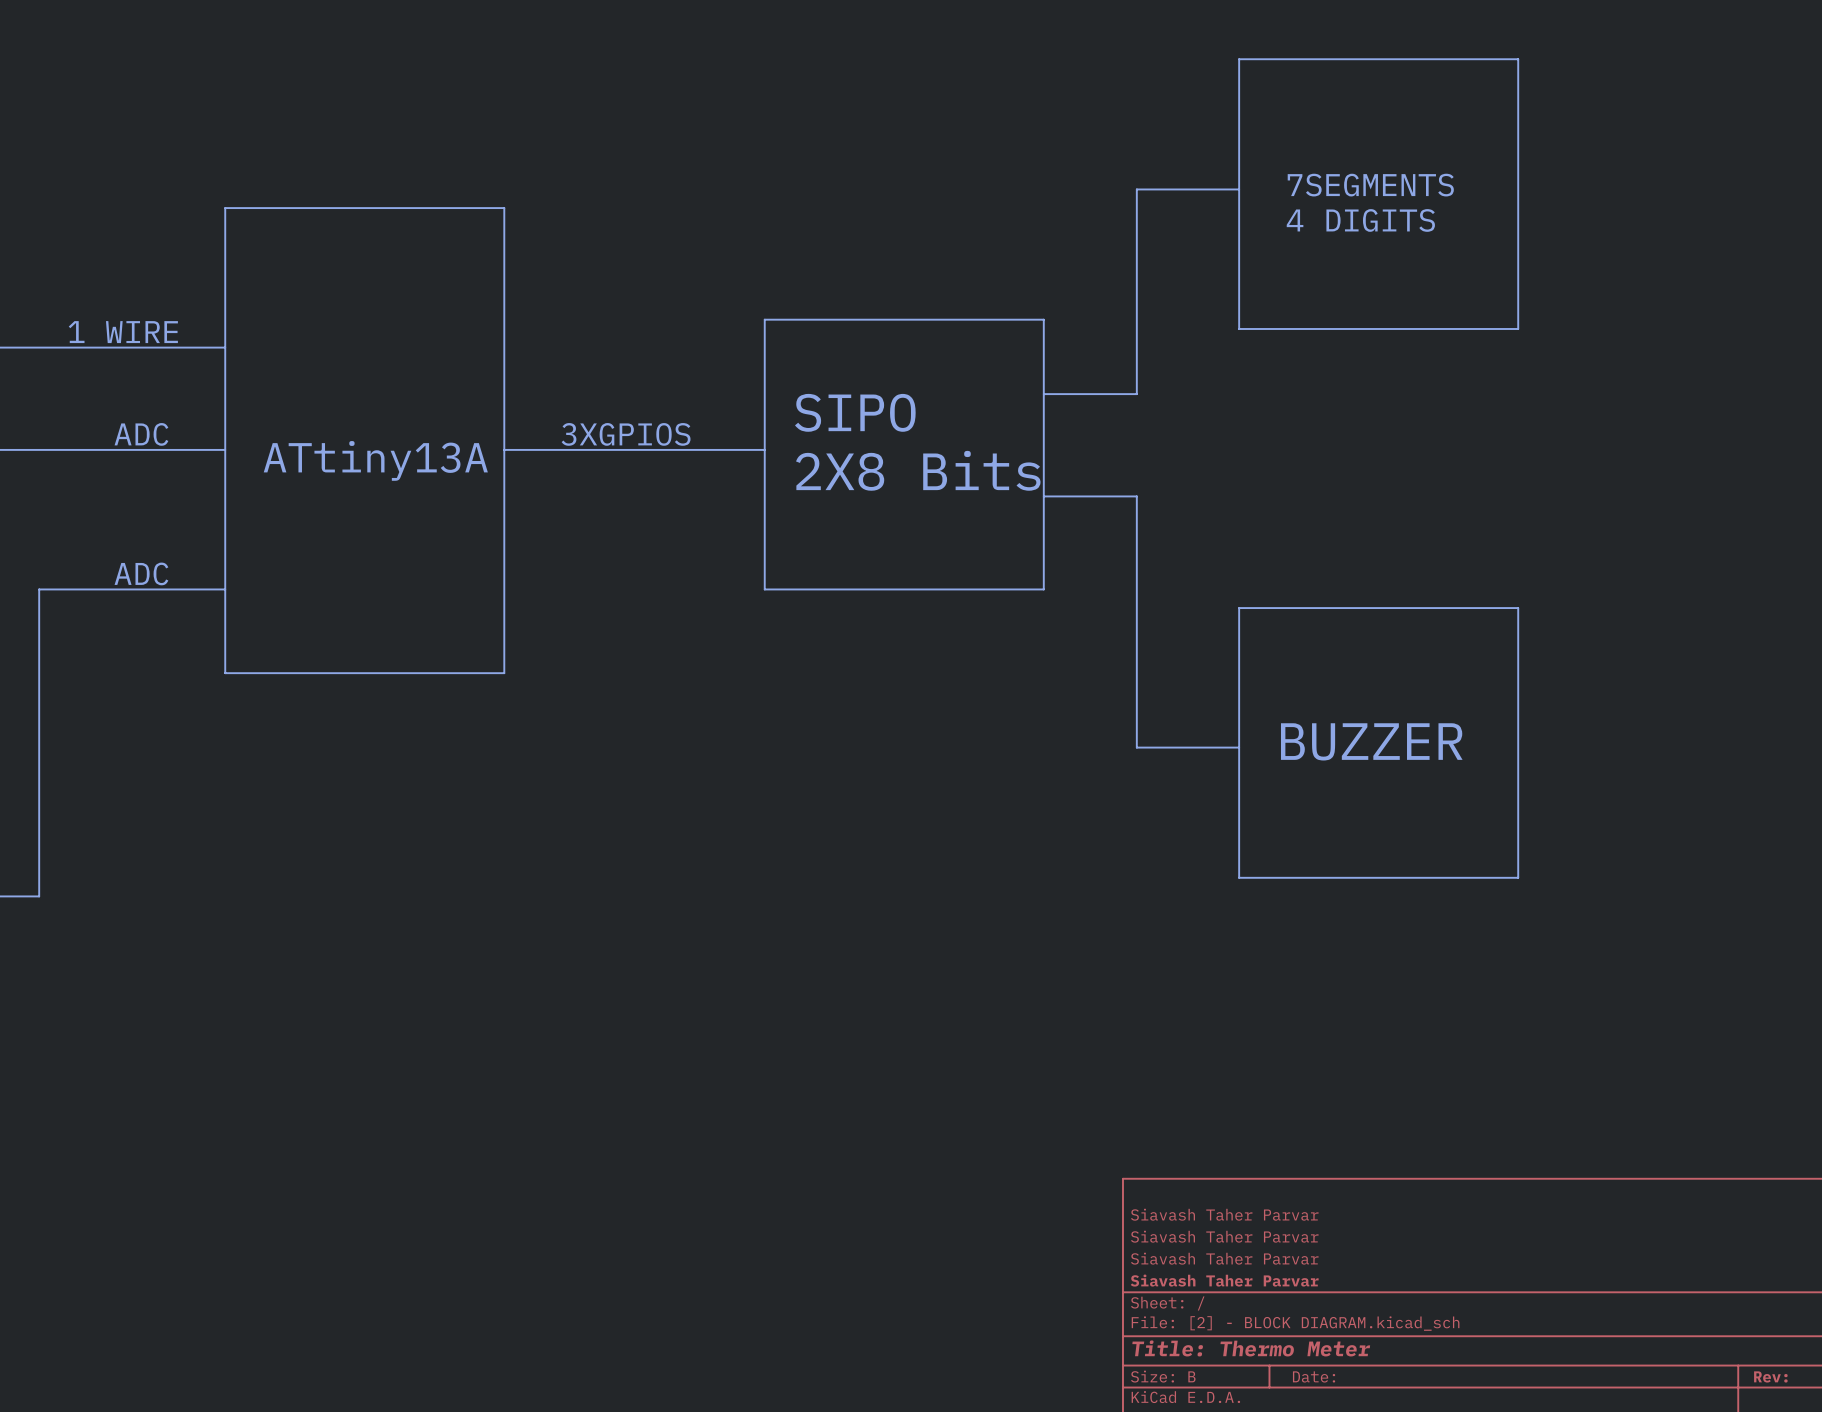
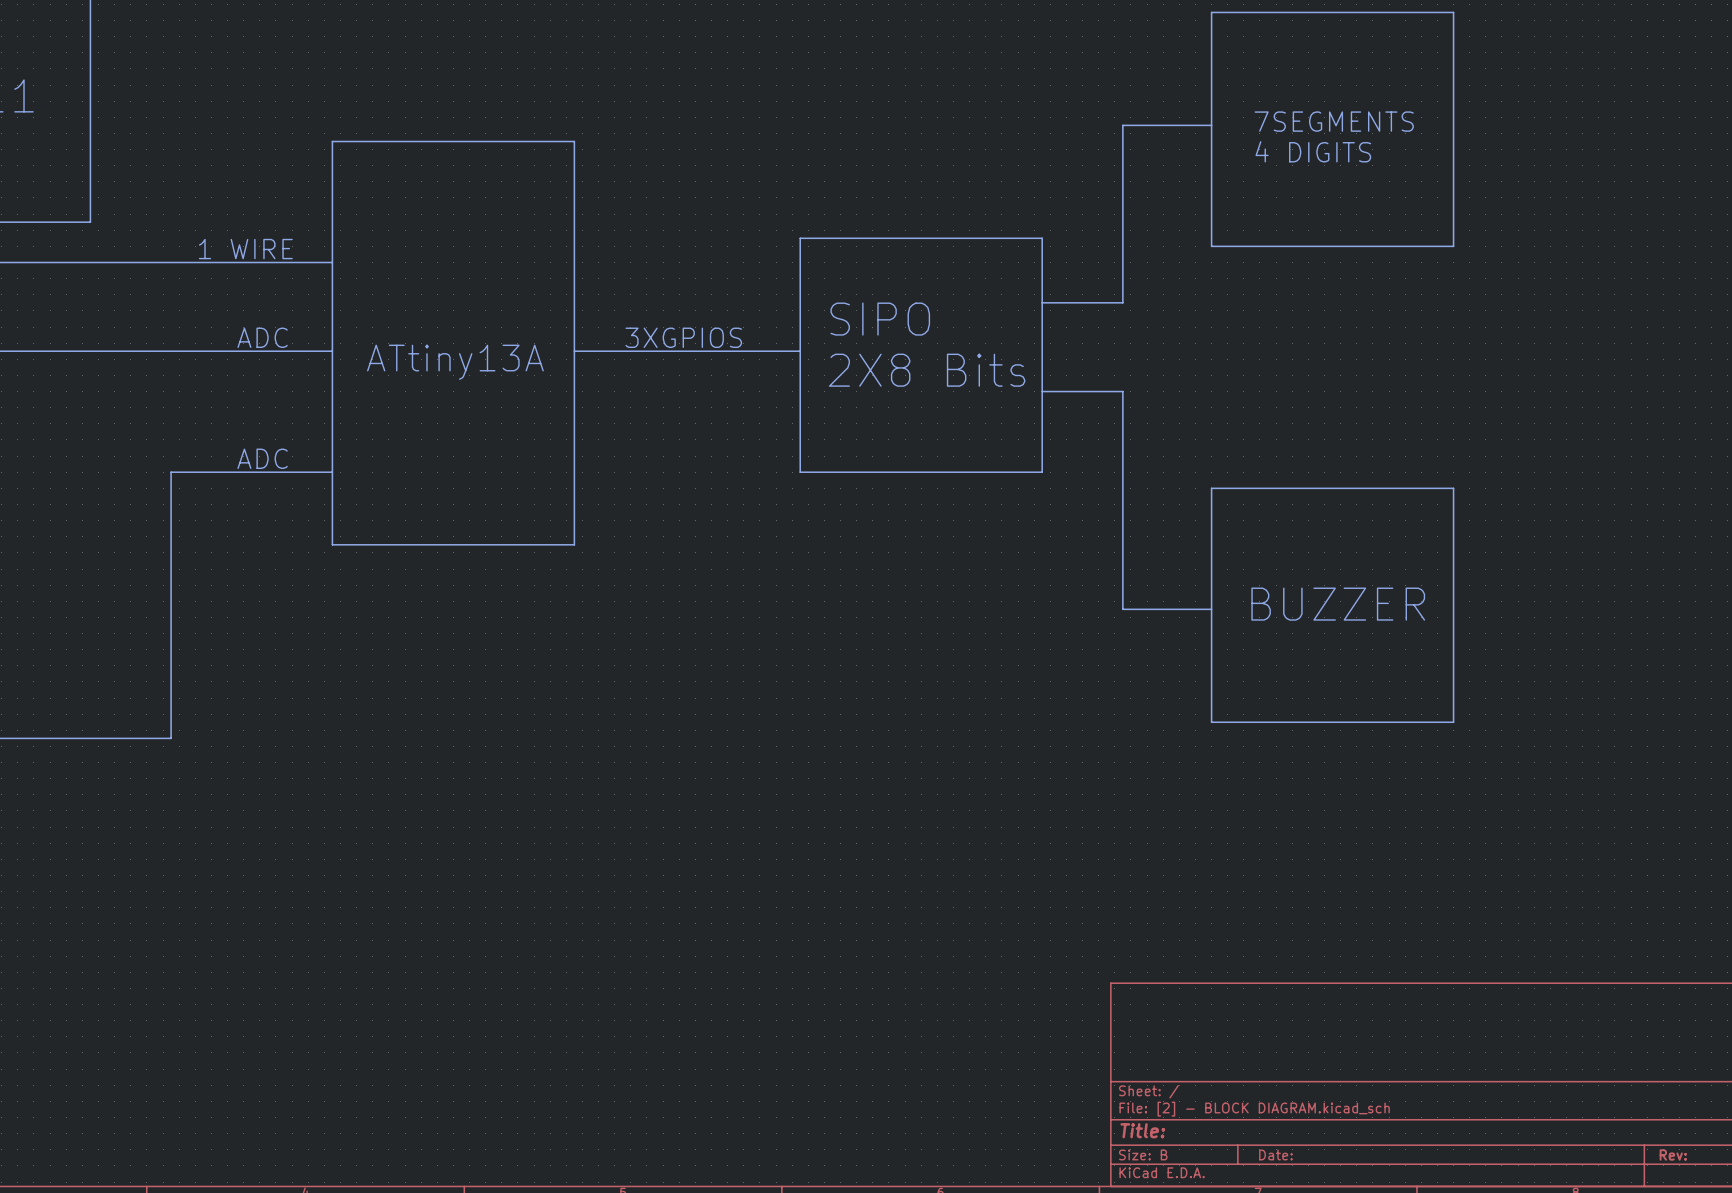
title block: Siavash Taher Parvar (1224, 1214) -> none
title block: Siavash Taher Parvar (1224, 1236) -> none
title block: Siavash Taher Parvar (1224, 1258) -> none
title block: Siavash Taher Parvar (1224, 1280) -> none
title block: Title: Thermo Meter (1251, 1348) -> Title: (1142, 1130)

